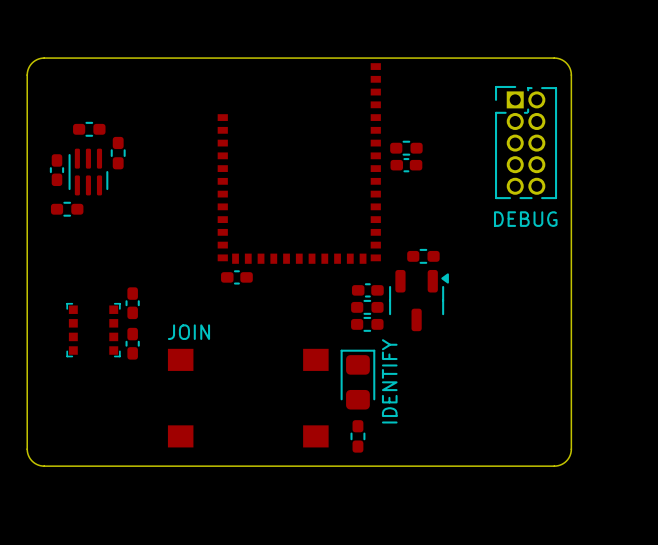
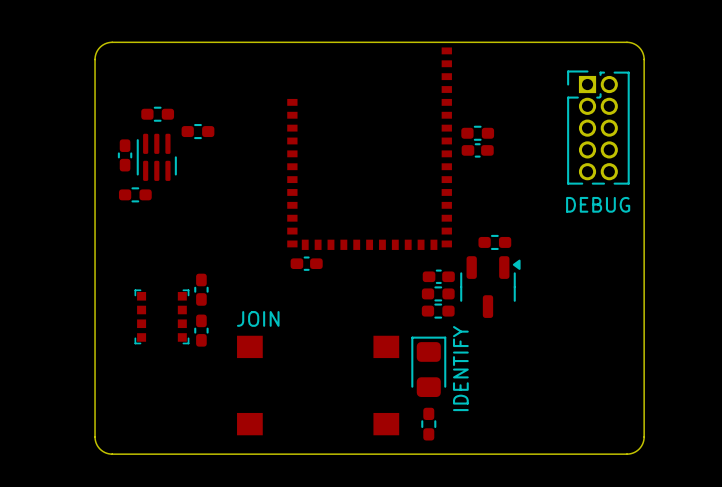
part rotation: 0° (118, 153) -> 90° clockwise (197, 131)

